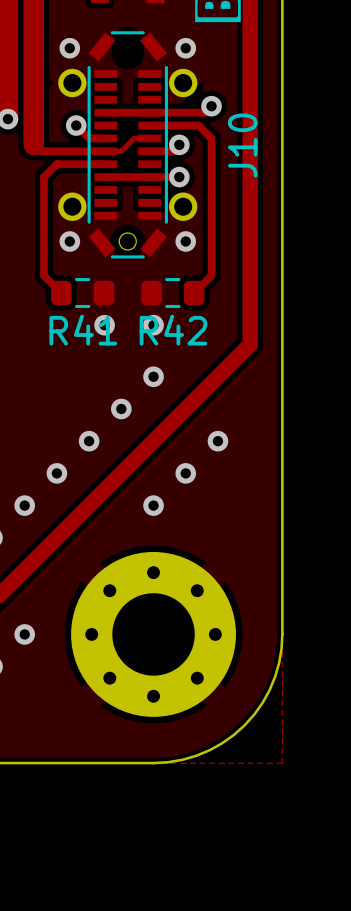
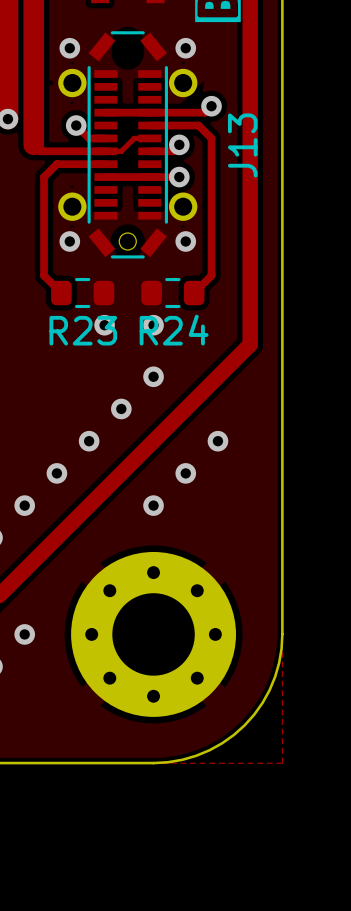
J10 name: J10 (242, 145) -> J13 (242, 145)
R41 name: R41 (83, 330) -> R23 (83, 330)
R42 name: R42 (173, 330) -> R24 (174, 330)

